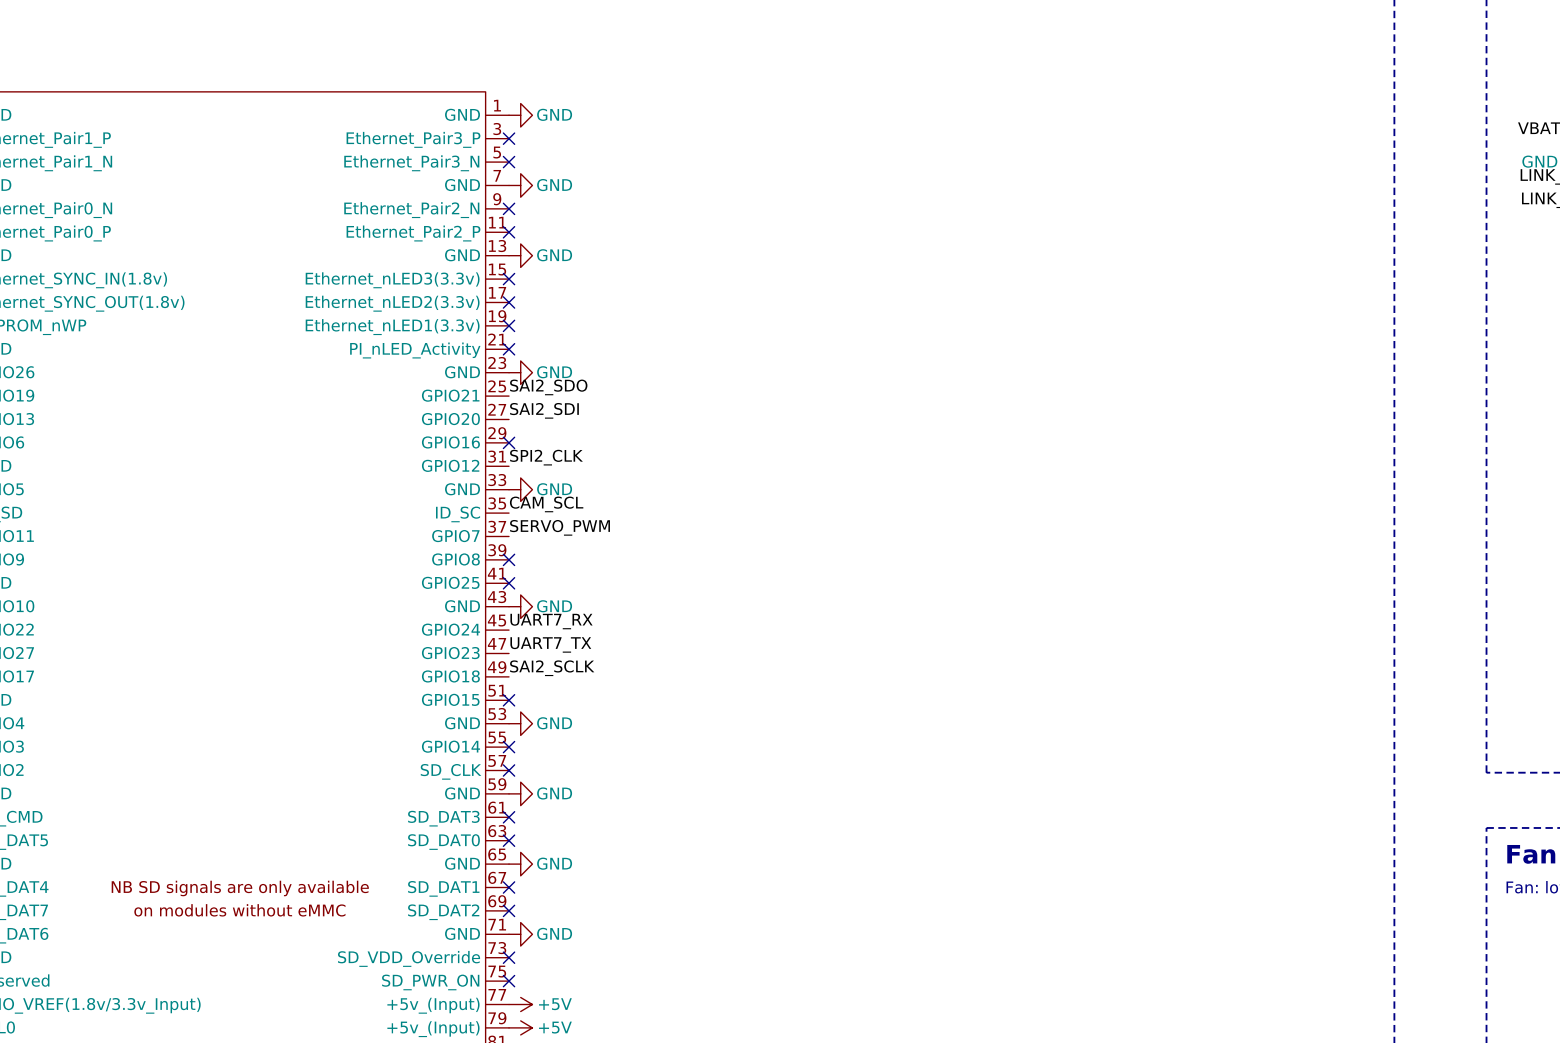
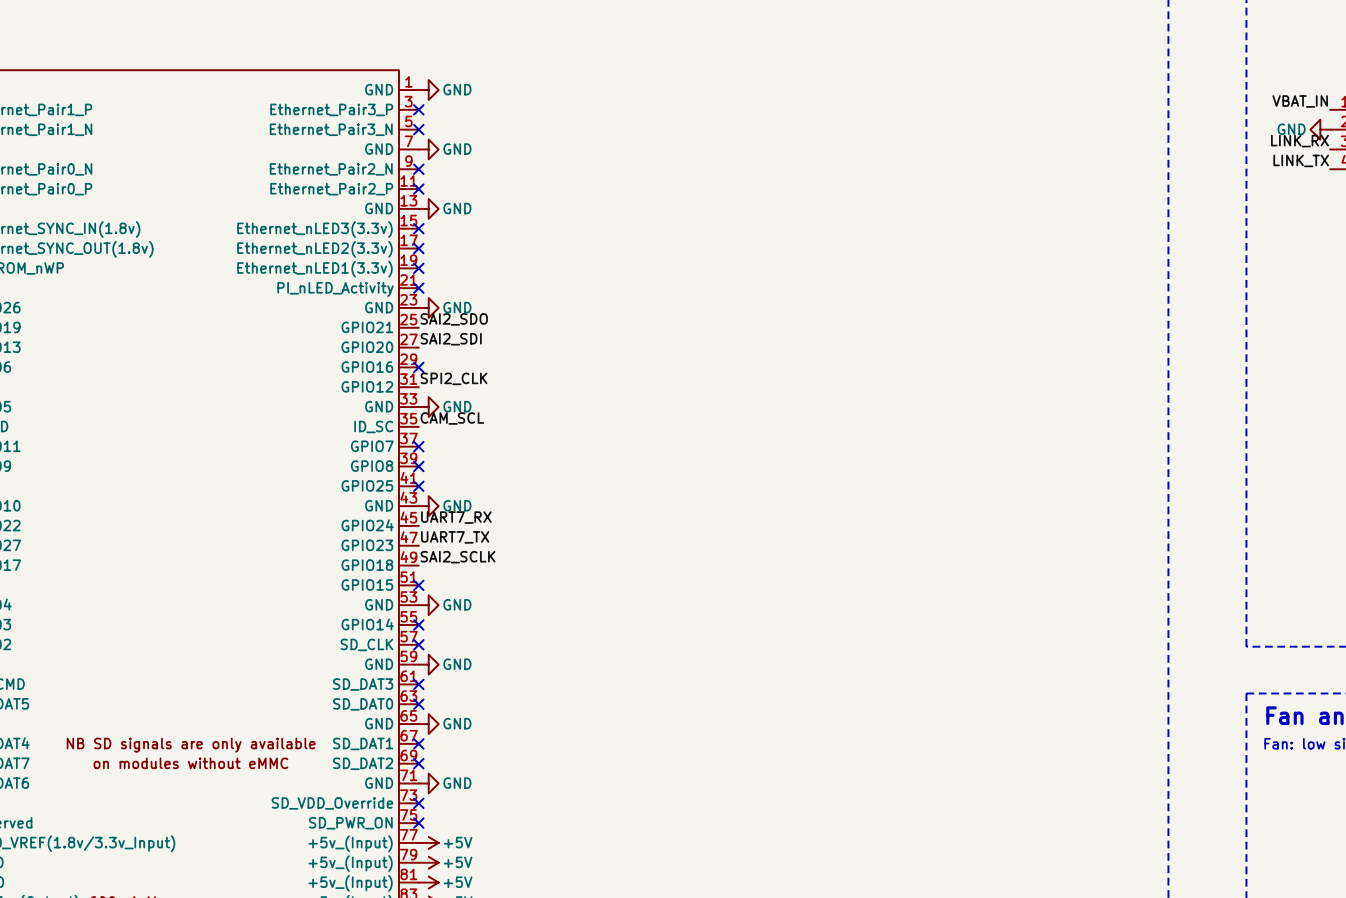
label: SERVO_PWM (560, 527) -> none
no-connect mark: none -> (418, 446)

